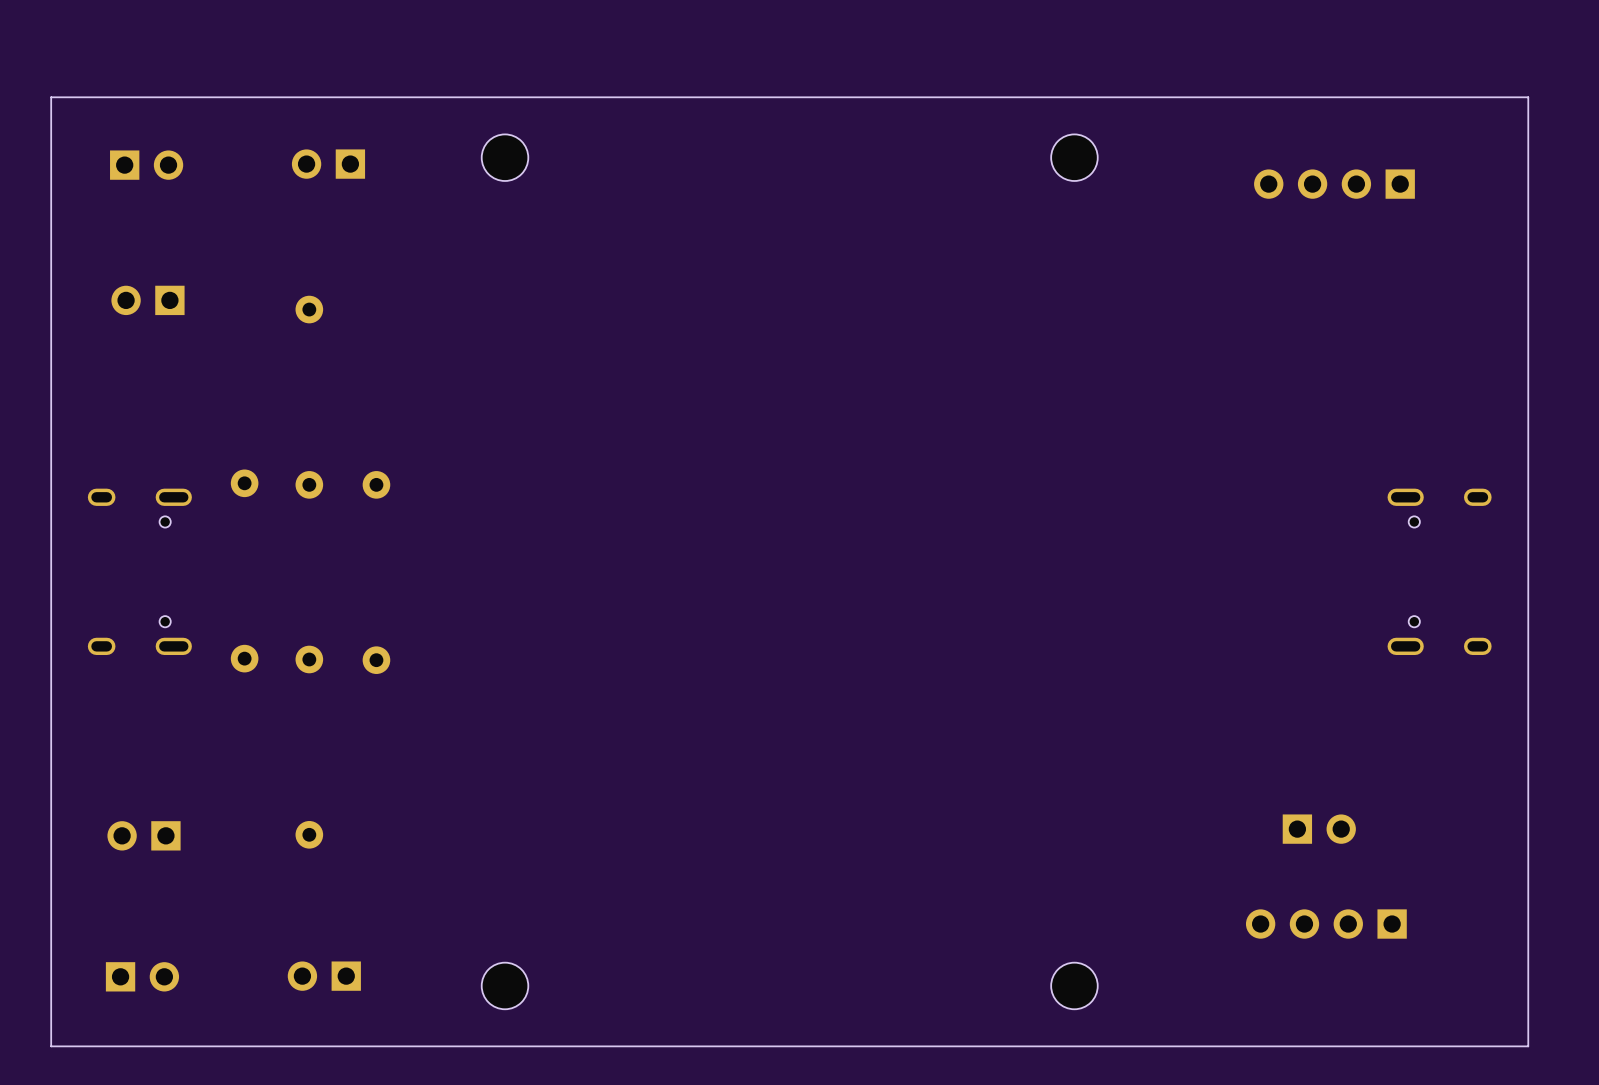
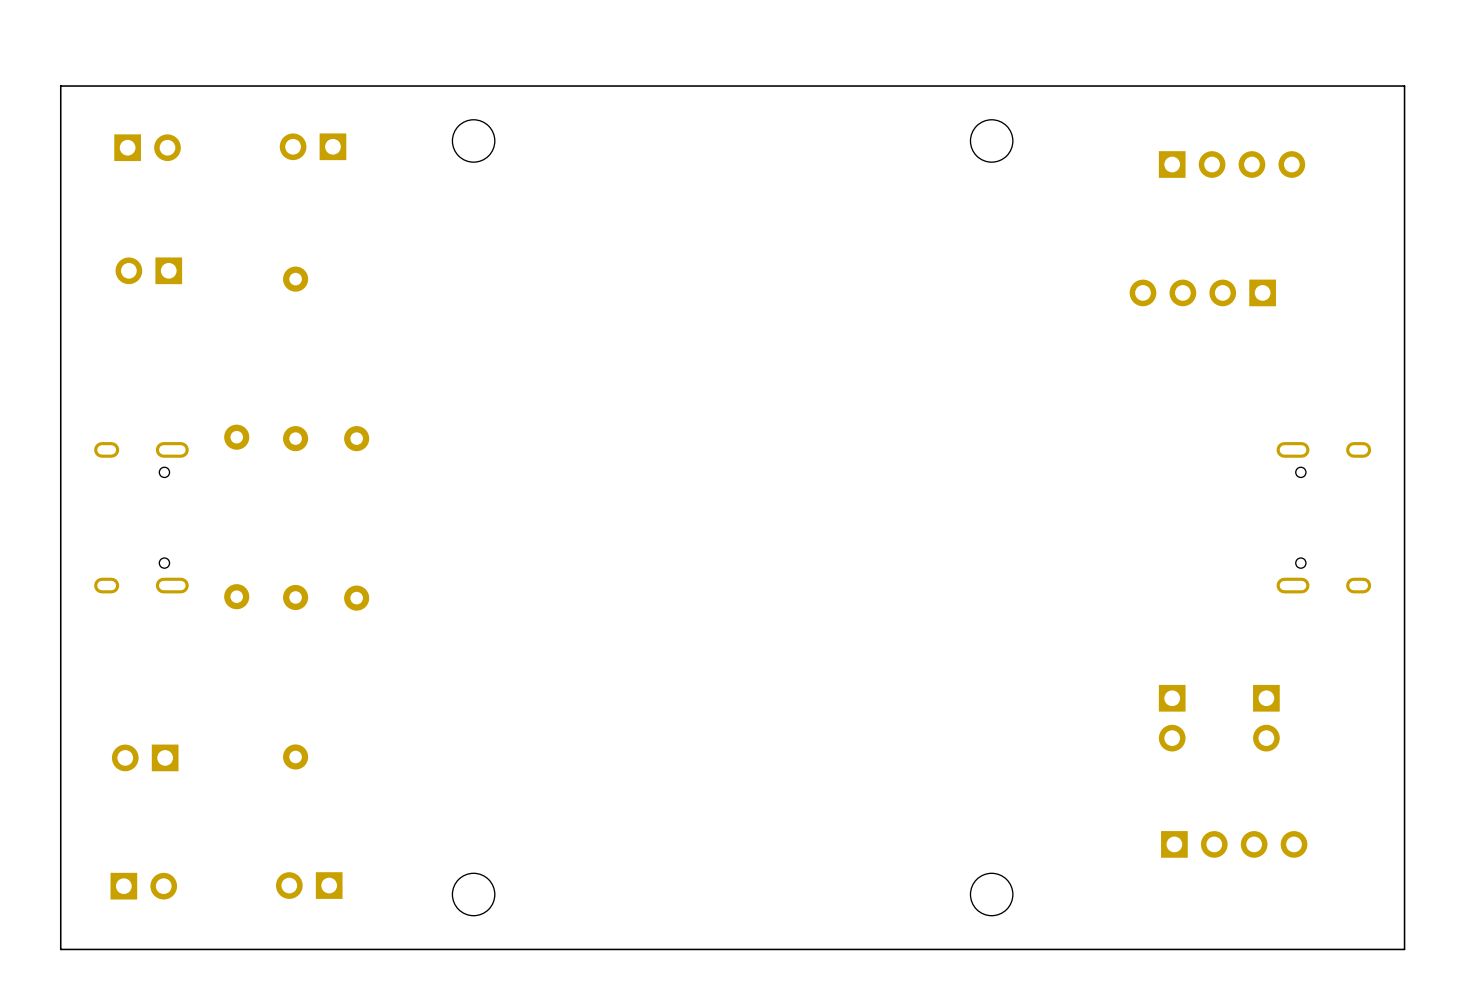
part rotation: 0° (1334, 184) -> 180° (1232, 164)
part: none -> (1202, 292)
part: none -> (1172, 718)
part: none -> (1266, 718)
part: (1319, 829) -> none
part rotation: 0° (1326, 924) -> 180° (1234, 844)

